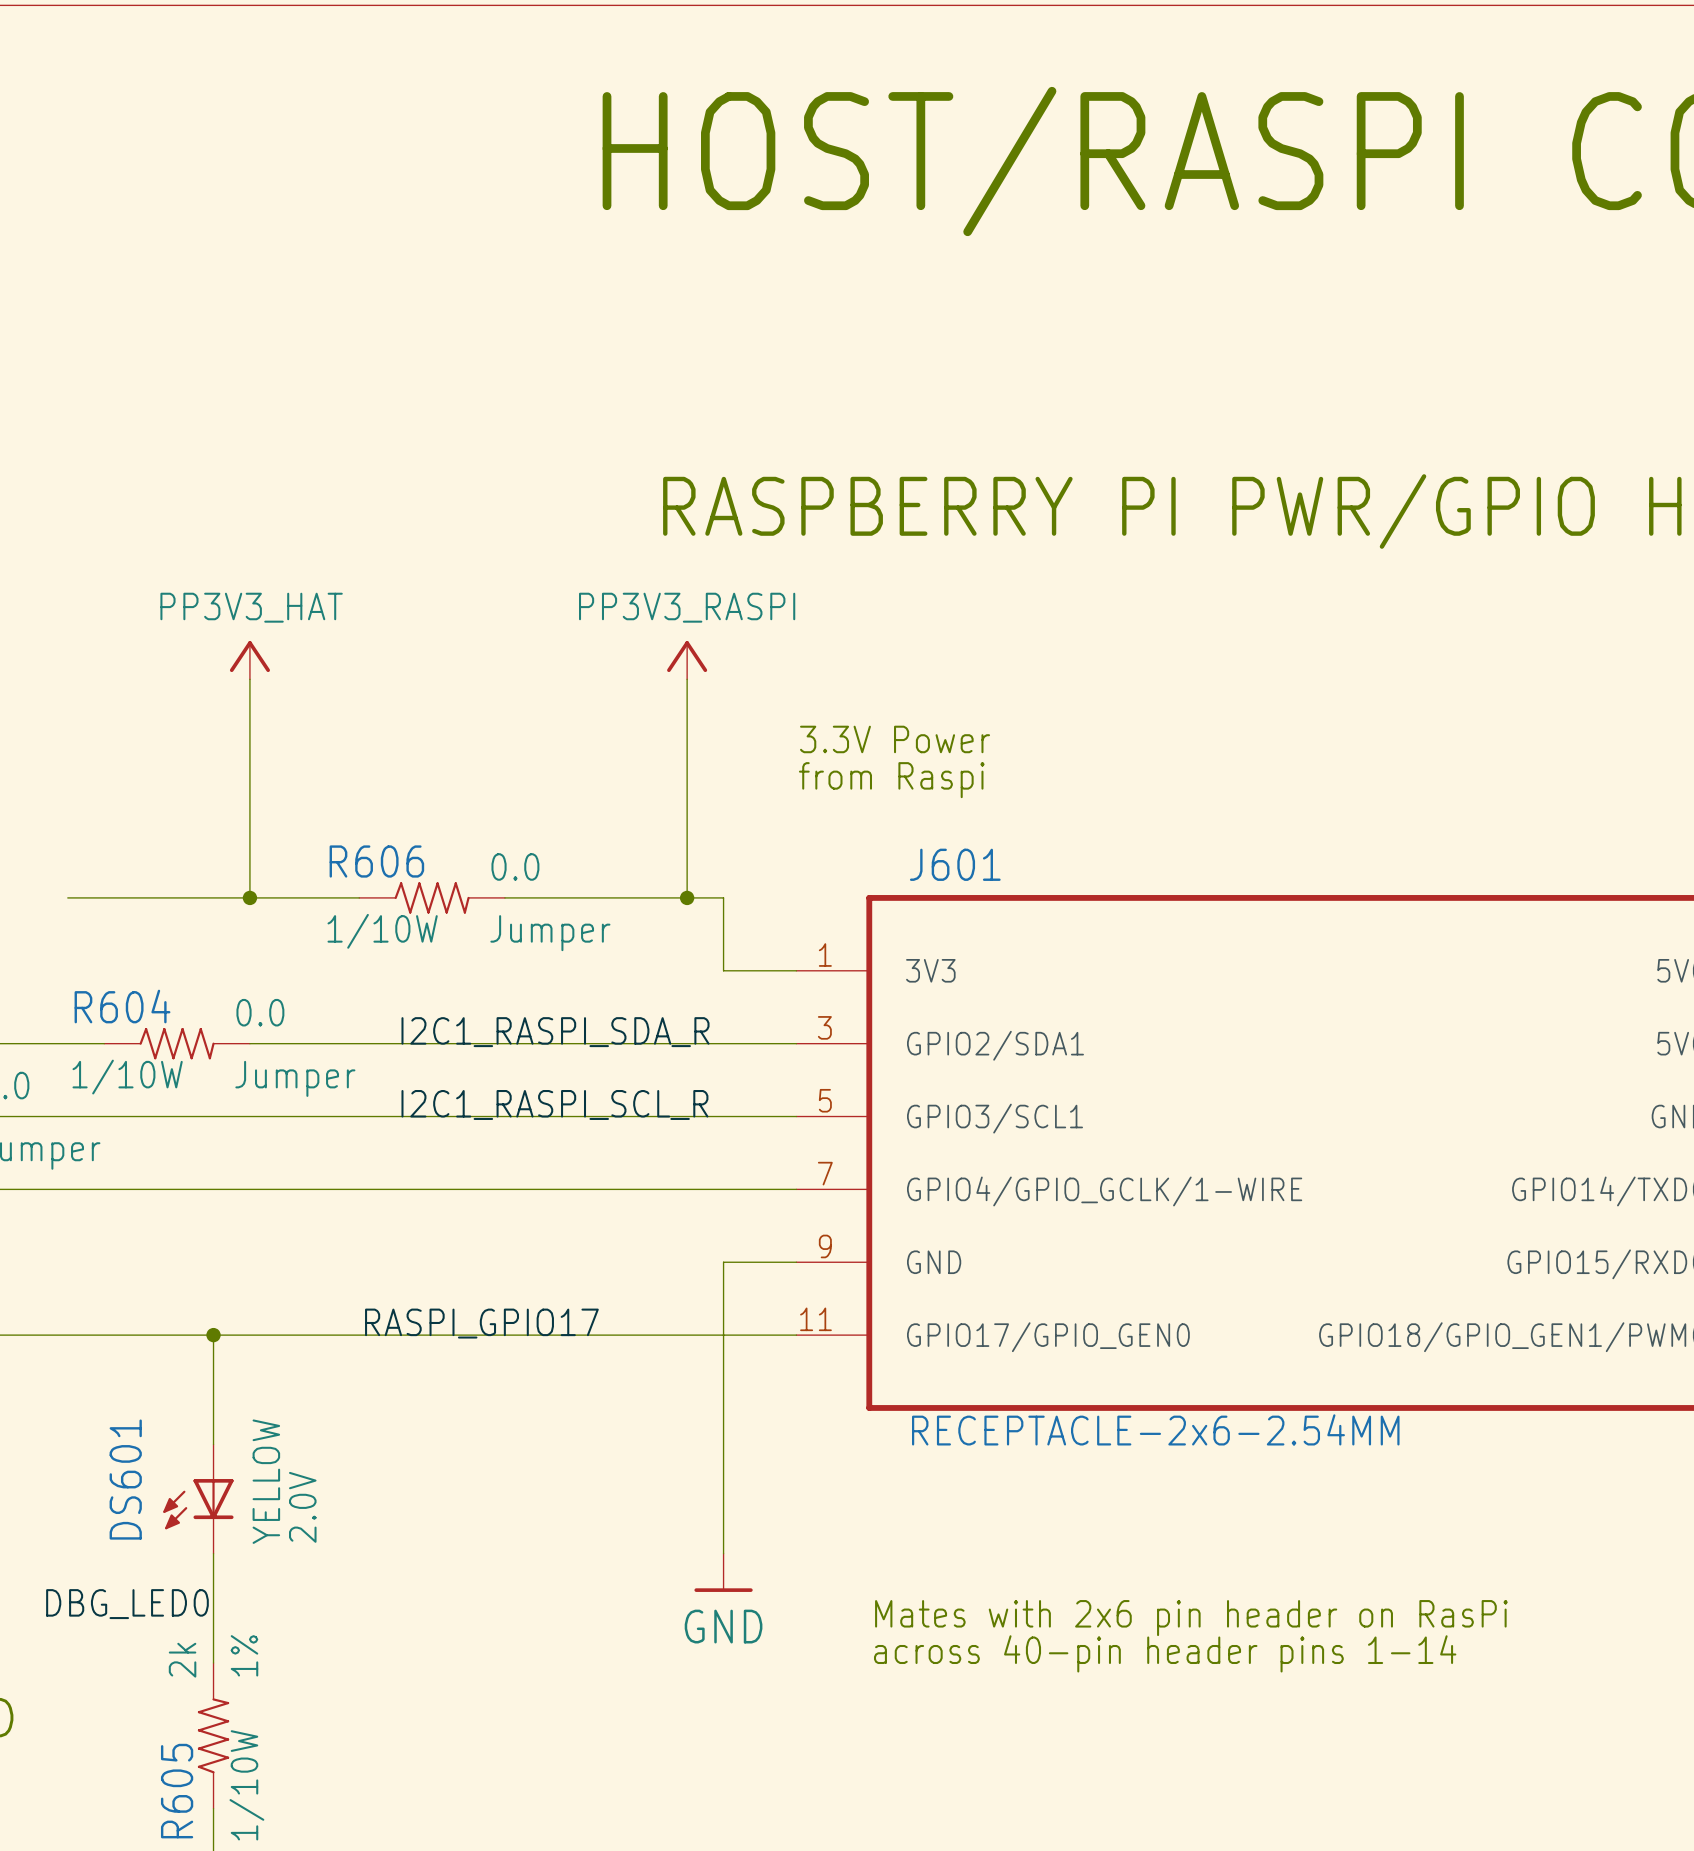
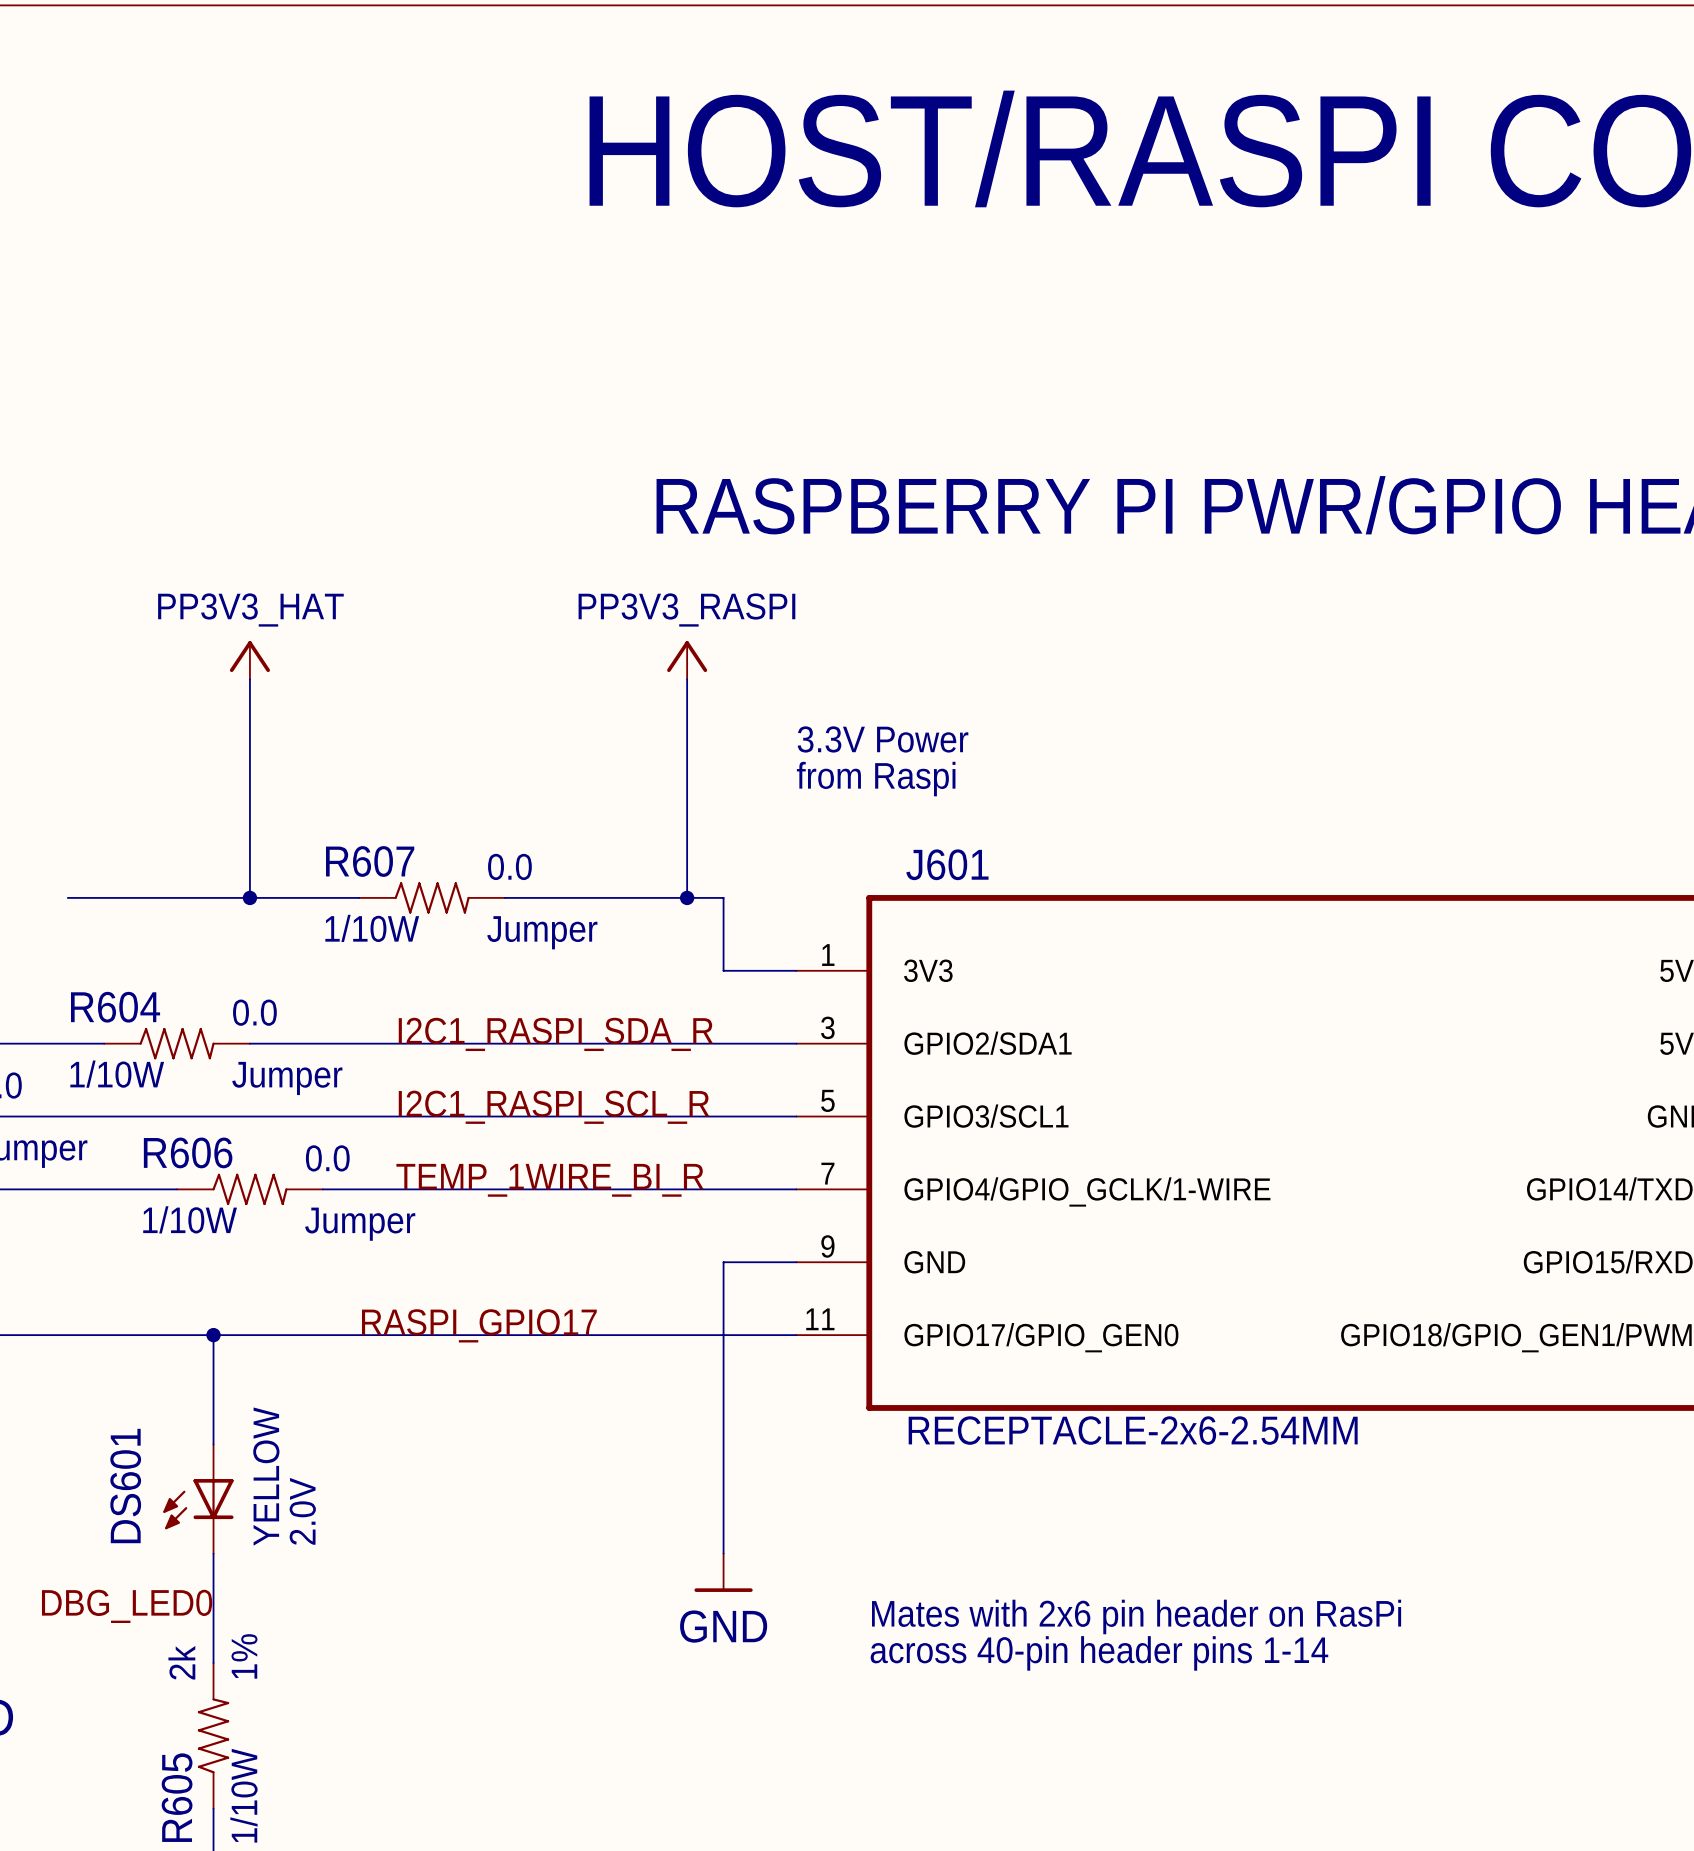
R606 name: R606 (376, 861) -> R607 (370, 861)
label: none -> TEMP_1WIRE_BI_R (550, 1180)
R606: none -> 0.0 (249, 1189)

